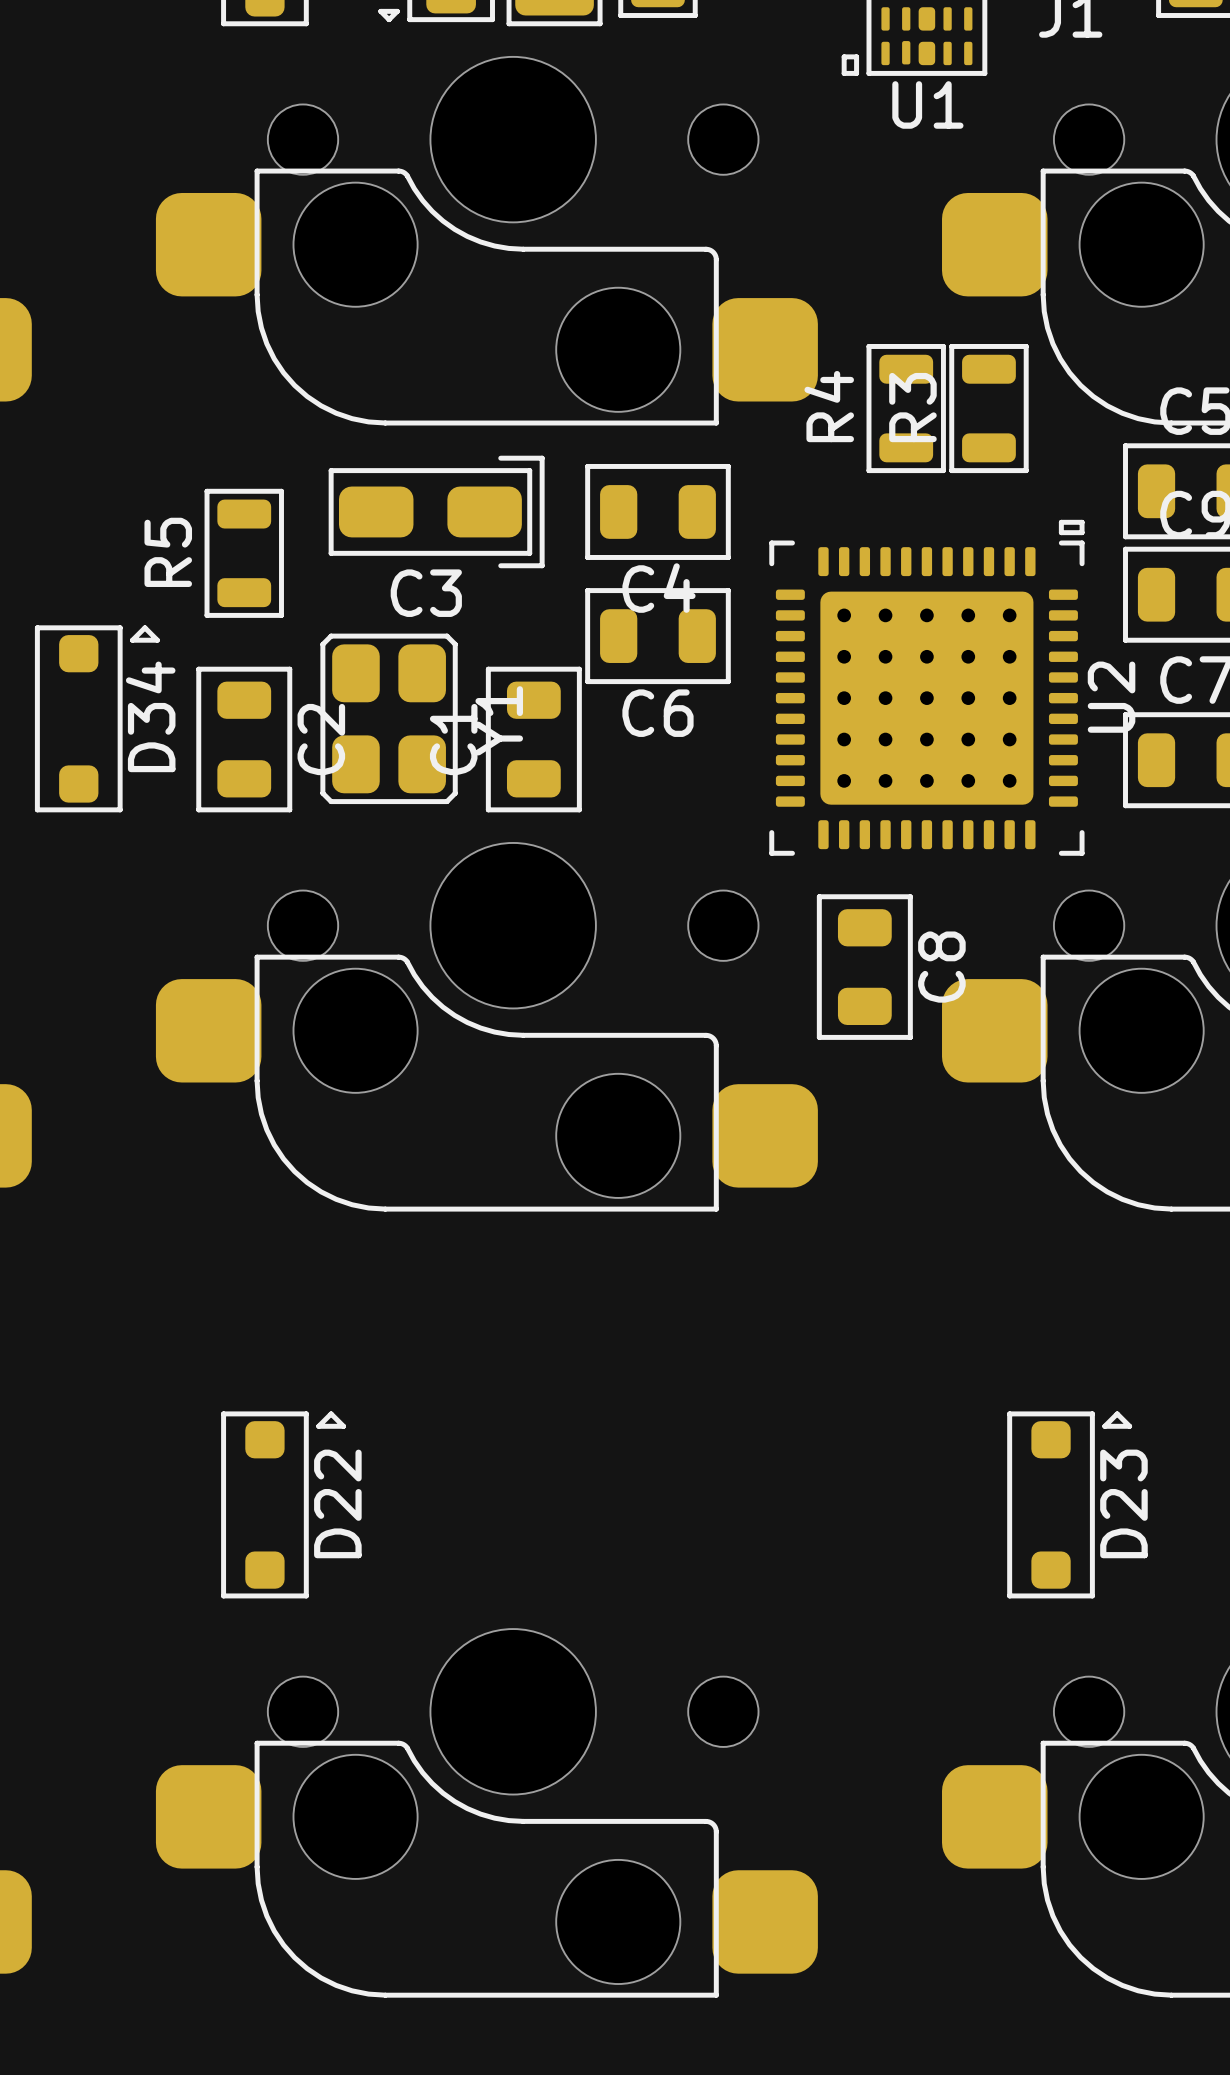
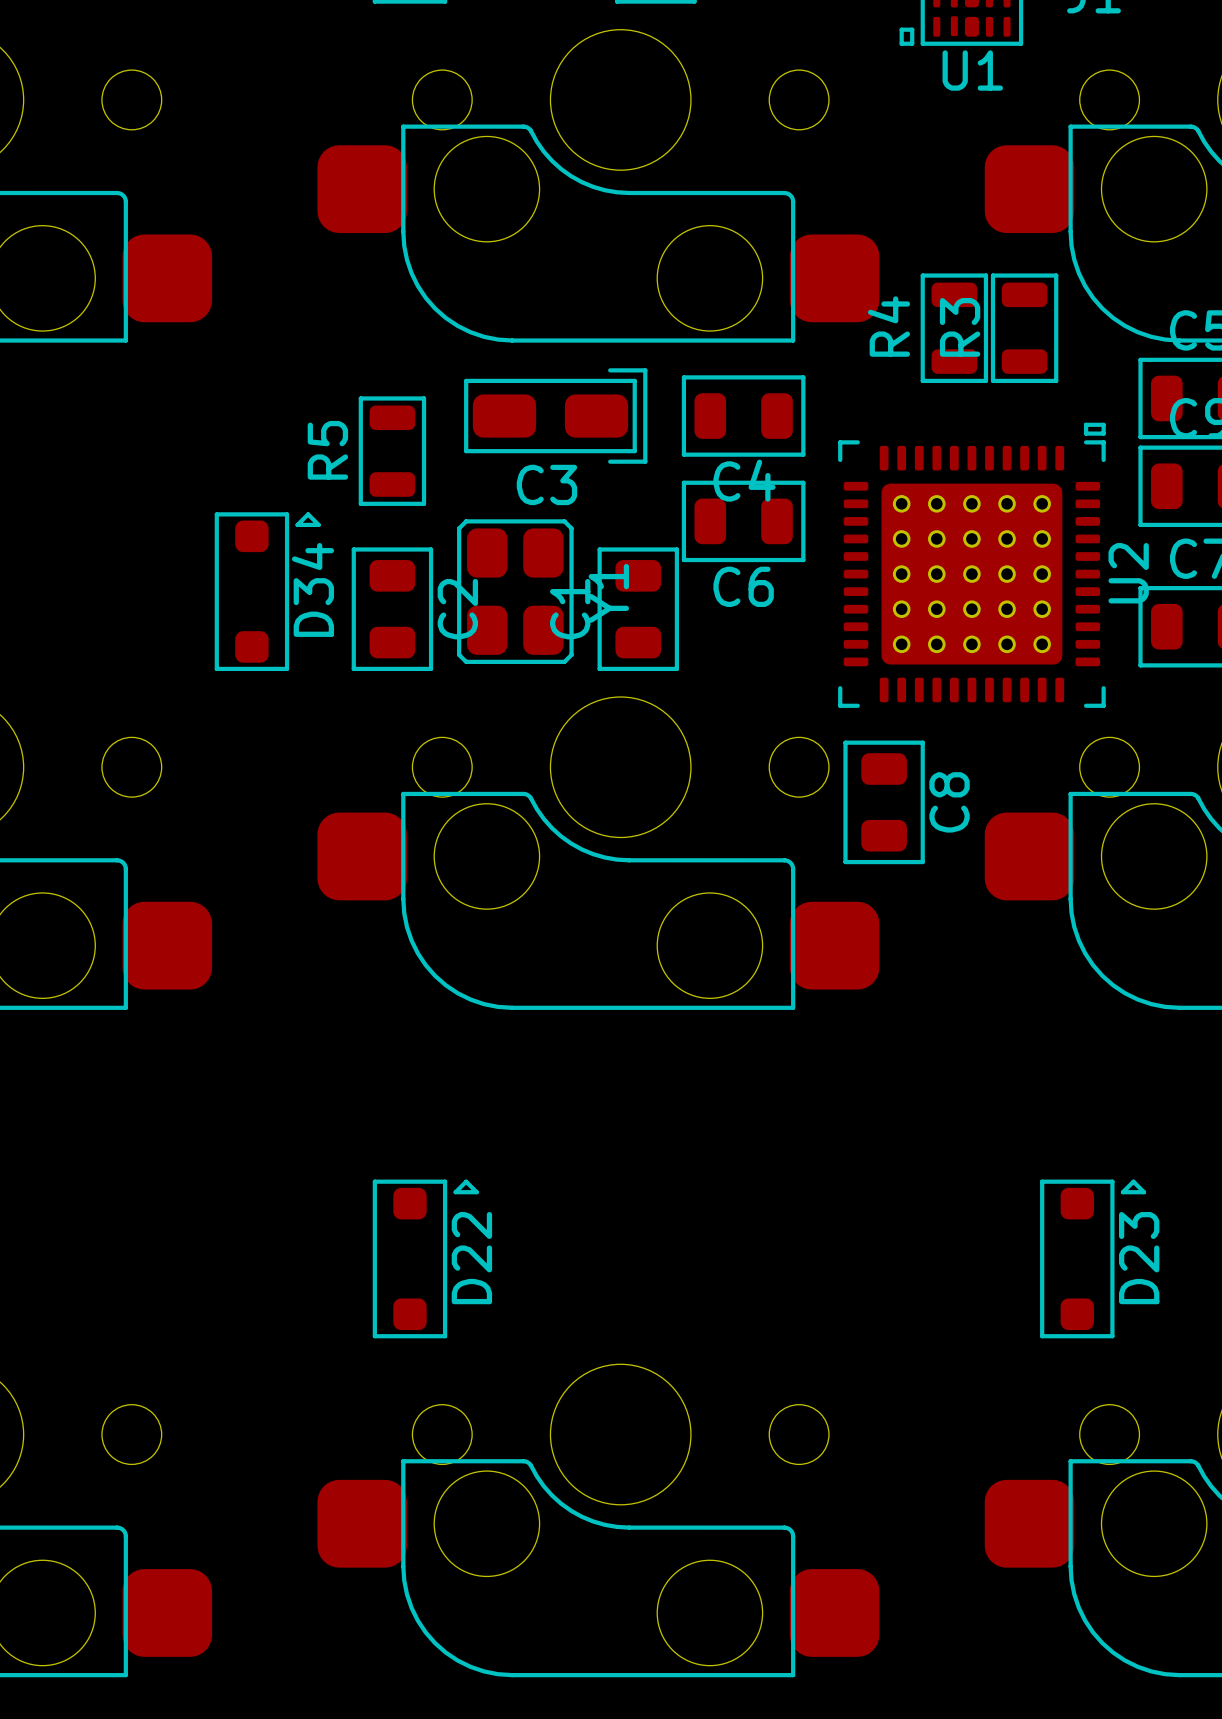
C8 position: (864, 967) -> (884, 802)

